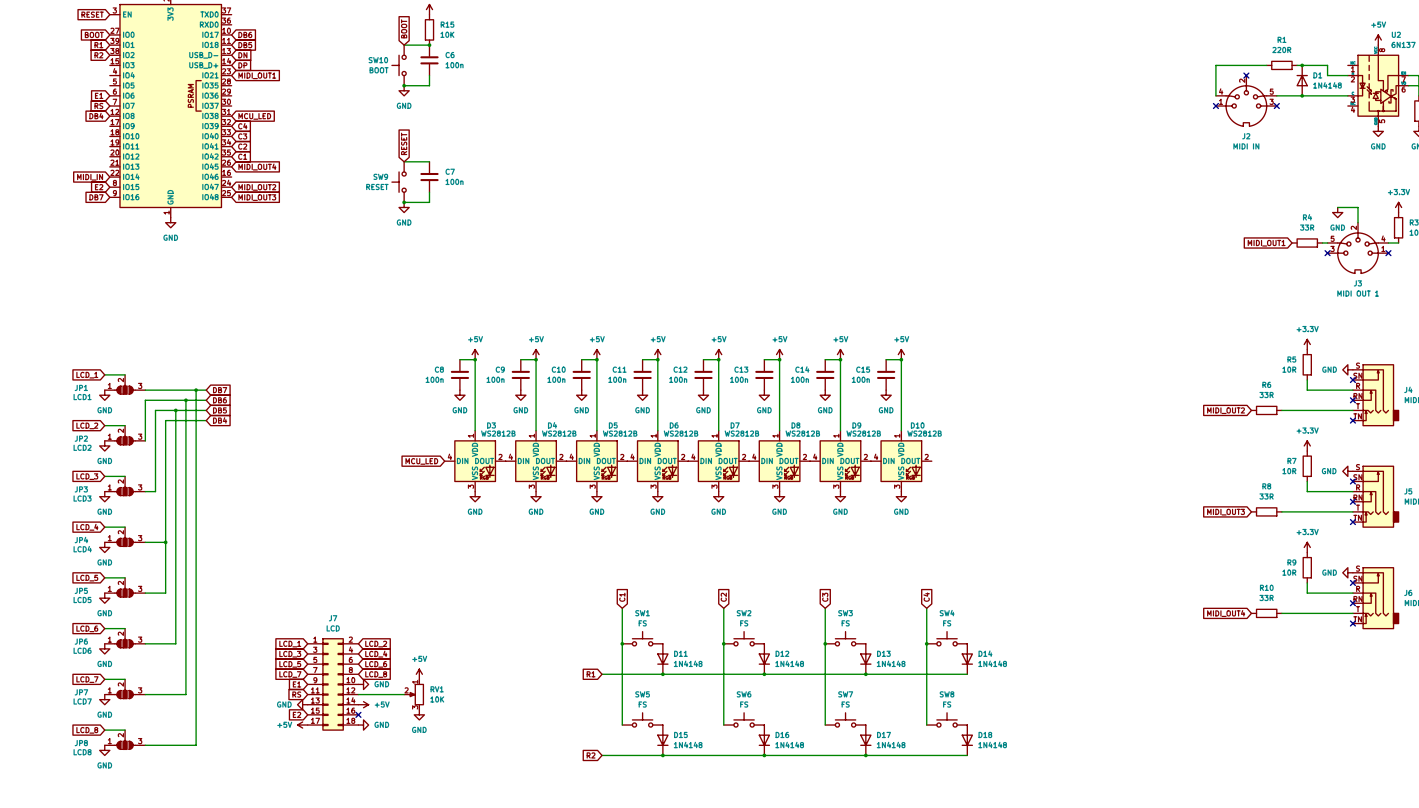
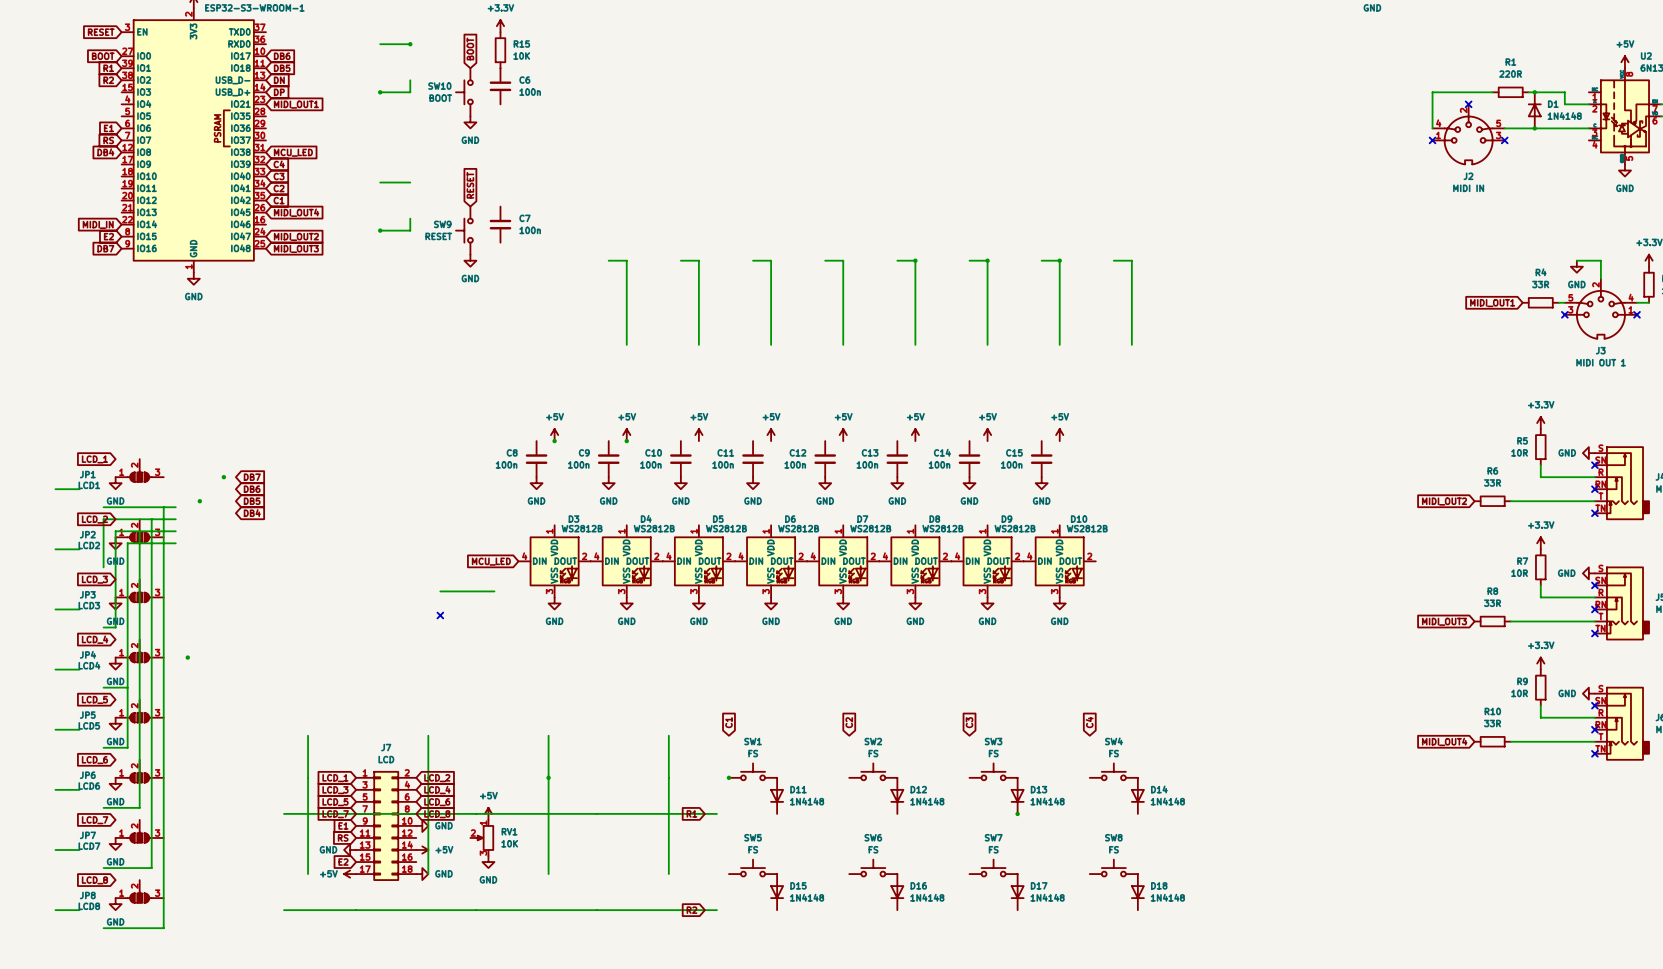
junction: none -> (410, 44)
wire: (404, 45) (429, 45) -> (380, 44) (410, 44)
junction: (429, 45) -> none
junction: none -> (380, 92)
wire: (429, 75) (429, 85) (404, 85) -> (410, 80) (410, 92) (380, 92)
junction: (404, 85) -> none
wire: (404, 161) (429, 161) -> (380, 182) (410, 182)
junction: none -> (380, 230)
wire: (429, 192) (429, 202) (404, 202) -> (410, 218) (410, 230) (380, 230)
junction: (404, 202) -> none
wire: none -> (608, 260) (626, 260) (626, 344)
wire: none -> (680, 260) (698, 260) (698, 344)
wire: none -> (753, 260) (771, 260) (771, 344)
wire: none -> (825, 260) (843, 260) (843, 344)
wire: none -> (897, 260) (915, 260) (915, 344)
junction: none -> (915, 260)
wire: none -> (969, 260) (987, 260) (987, 344)
junction: none -> (987, 260)
wire: none -> (1041, 260) (1059, 260) (1059, 344)
junction: none -> (1059, 260)
wire: none -> (1113, 260) (1131, 260) (1131, 344)
wire: (459, 359) (475, 359) (475, 430) -> none
wire: (520, 359) (536, 359) (536, 430) -> none
wire: (581, 359) (596, 359) (596, 430) -> none
junction: (596, 359) -> none
wire: (642, 359) (657, 359) (657, 430) -> none
junction: (657, 359) -> none
wire: (703, 359) (718, 359) (718, 430) -> none
junction: (718, 359) -> none
wire: (764, 359) (779, 359) (779, 430) -> none
junction: (779, 359) -> none
wire: (825, 359) (840, 359) (840, 430) -> none
junction: (840, 359) -> none
wire: (886, 359) (901, 359) (901, 430) -> none
junction: (901, 359) -> none
wire: (104, 374) (125, 374) -> (55, 489) (79, 489)
wire: (145, 390) (206, 390) -> (103, 507) (175, 507)
wire: (196, 390) (196, 745) (145, 745) -> none
wire: (185, 400) (185, 694) (145, 694) -> (151, 519) (151, 868) (103, 868)
junction: (185, 400) -> none
wire: (206, 400) (145, 400) (145, 415) -> none
wire: (175, 410) (175, 643) (145, 643) -> (139, 531) (139, 807) (103, 807)
wire: (206, 410) (155, 410) (155, 491) (145, 491) -> (175, 531) (115, 531) (115, 627) (103, 627)
wire: (206, 420) (165, 420) (165, 593) (145, 593) -> (175, 543) (127, 543) (127, 747) (103, 747)
wire: none -> (115, 519) (103, 519) (103, 567)
wire: none -> (139, 519) (175, 519)
wire: none -> (163, 537) (163, 928) (103, 928)
wire: none -> (55, 549) (79, 549)
wire: (104, 476) (125, 476) -> (55, 609) (79, 609)
wire: none -> (440, 591) (494, 591)
no-connect mark: none -> (440, 615)
wire: (104, 527) (125, 527) -> (55, 669) (79, 669)
wire: (145, 542) (165, 542) -> (103, 687) (127, 687)
wire: (104, 577) (125, 577) -> (55, 729) (79, 729)
wire: none -> (308, 735) (308, 874)
wire: none -> (428, 735) (428, 874)
wire: none -> (548, 735) (548, 874)
wire: (622, 608) (622, 725) -> (668, 735) (668, 874)
wire: (723, 608) (723, 725) -> none
wire: (825, 608) (825, 725) -> none
wire: (926, 608) (926, 725) -> none
wire: (104, 628) (125, 628) -> (55, 789) (79, 789)
junction: none -> (548, 777)
junction: (723, 643) -> none
junction: (825, 643) -> none
junction: (926, 643) -> none
wire: none -> (283, 813) (704, 813)
wire: (612, 674) (967, 674) -> none
junction: (662, 674) -> none
junction: (764, 674) -> none
wire: (104, 679) (125, 679) -> (55, 850) (79, 850)
wire: (358, 694) (404, 694) -> none
no-connect mark: (358, 714) -> none
wire: (104, 730) (125, 730) -> (55, 910) (79, 910)
wire: none -> (283, 910) (704, 910)
wire: (612, 755) (967, 755) -> none
junction: (662, 755) -> none
junction: (764, 755) -> none
junction: (865, 755) -> none

